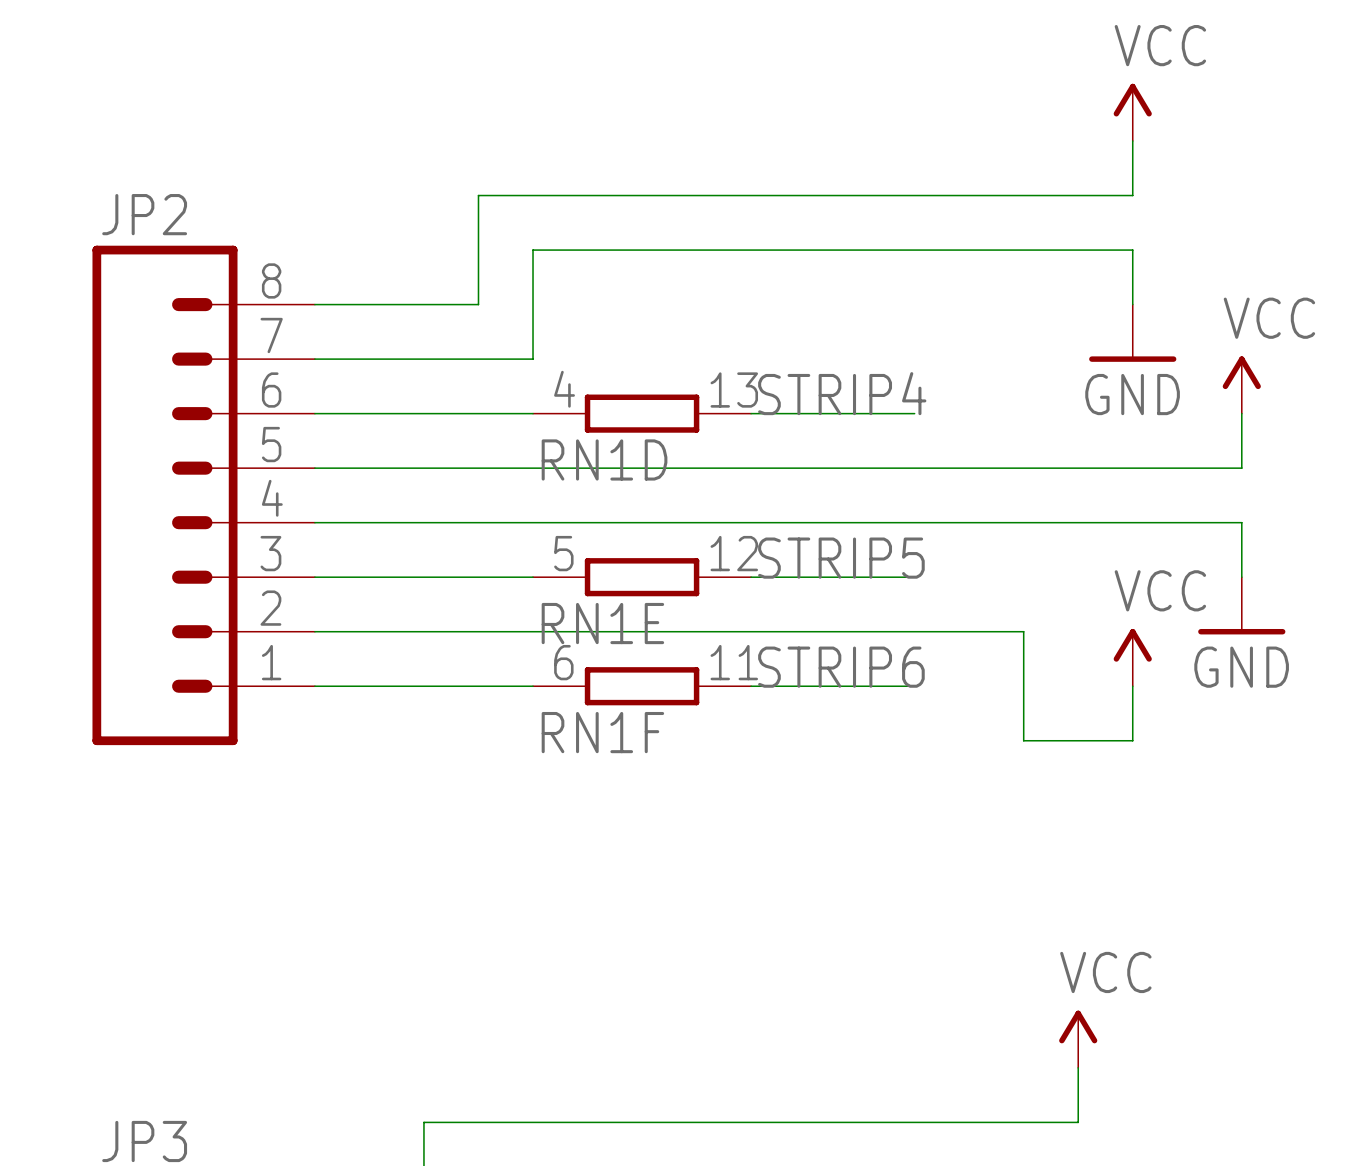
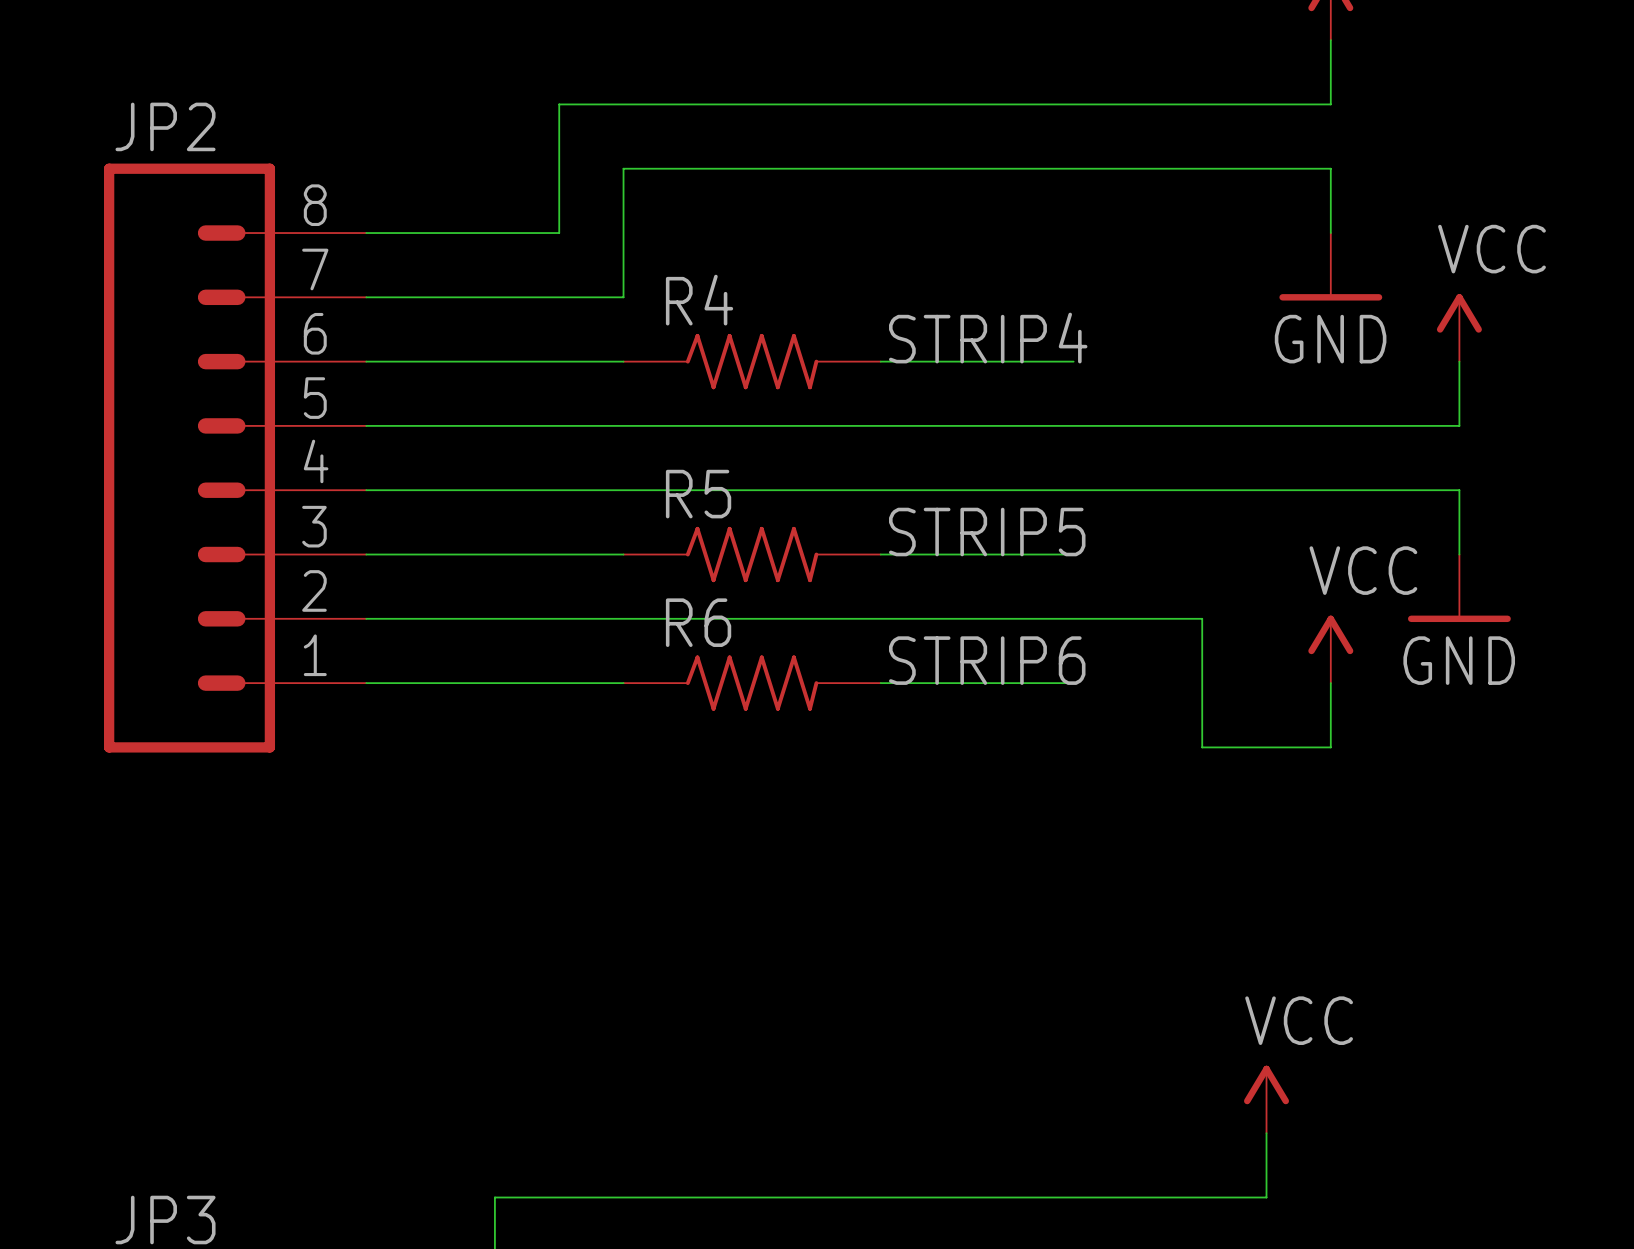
RN1D: (642, 413) -> none
R4: none -> (752, 361)
RN1E: (642, 577) -> none
R5: none -> (752, 554)
RN1F: (642, 686) -> none
R6: none -> (752, 683)

